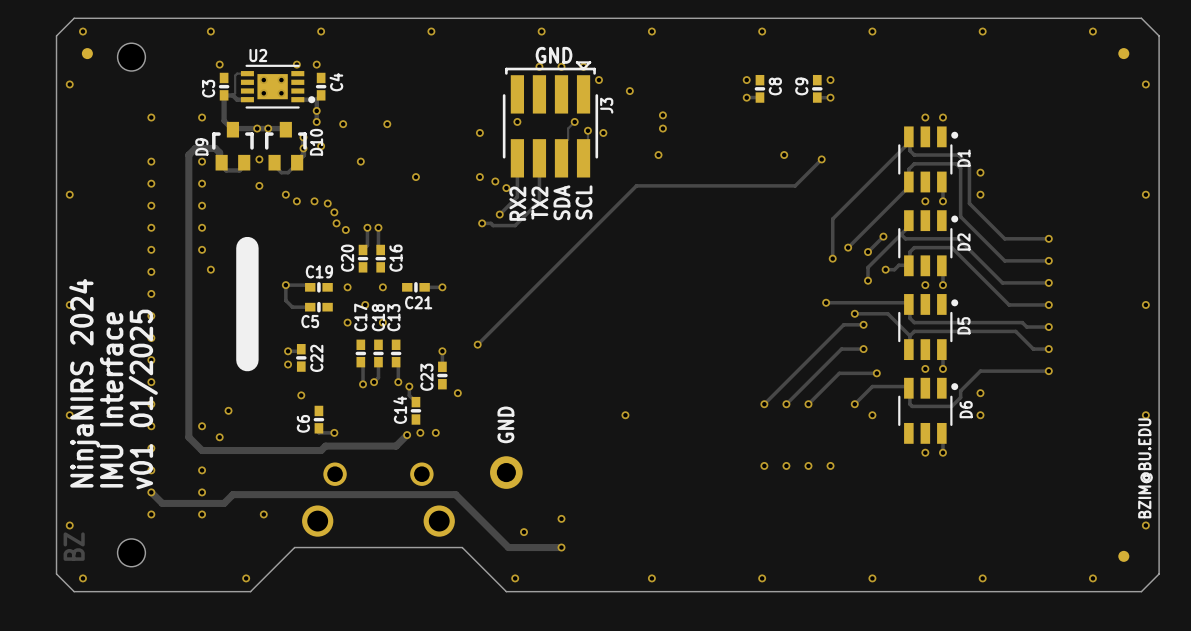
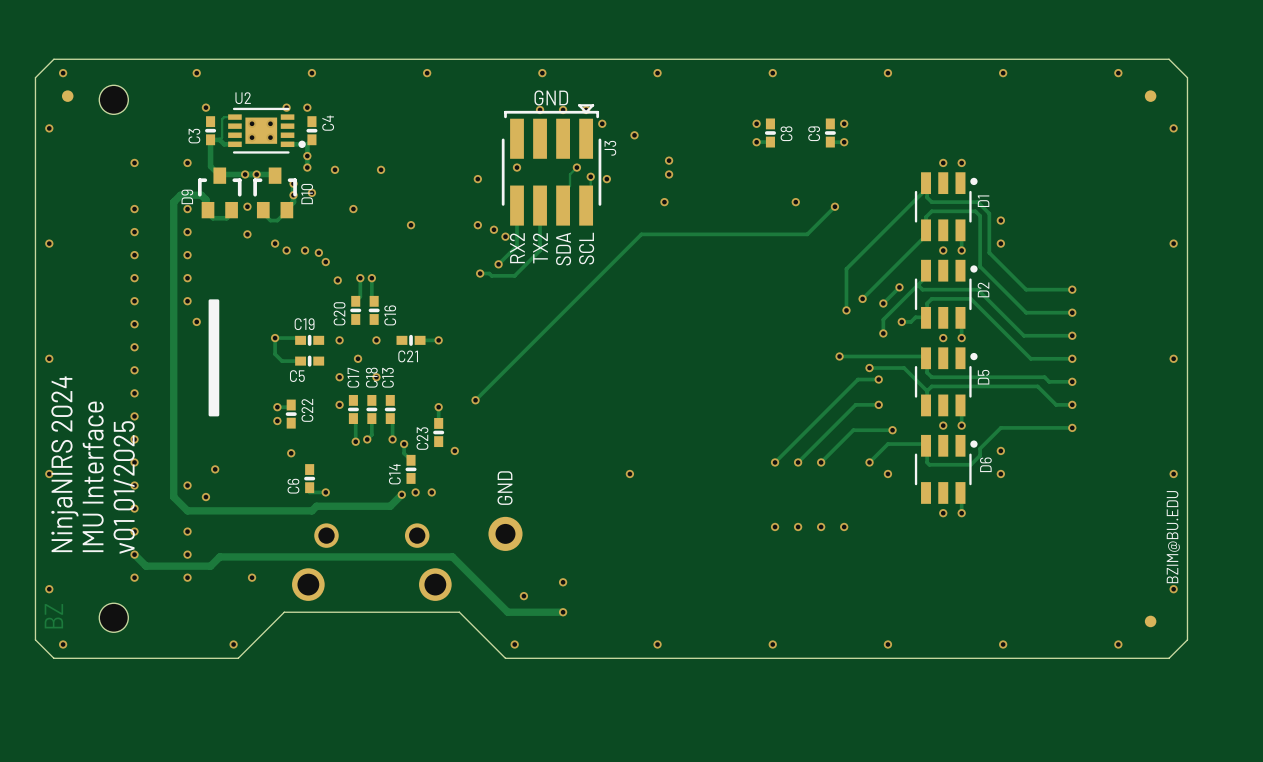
via: (336, 223) -> none
via: none -> (339, 404)

